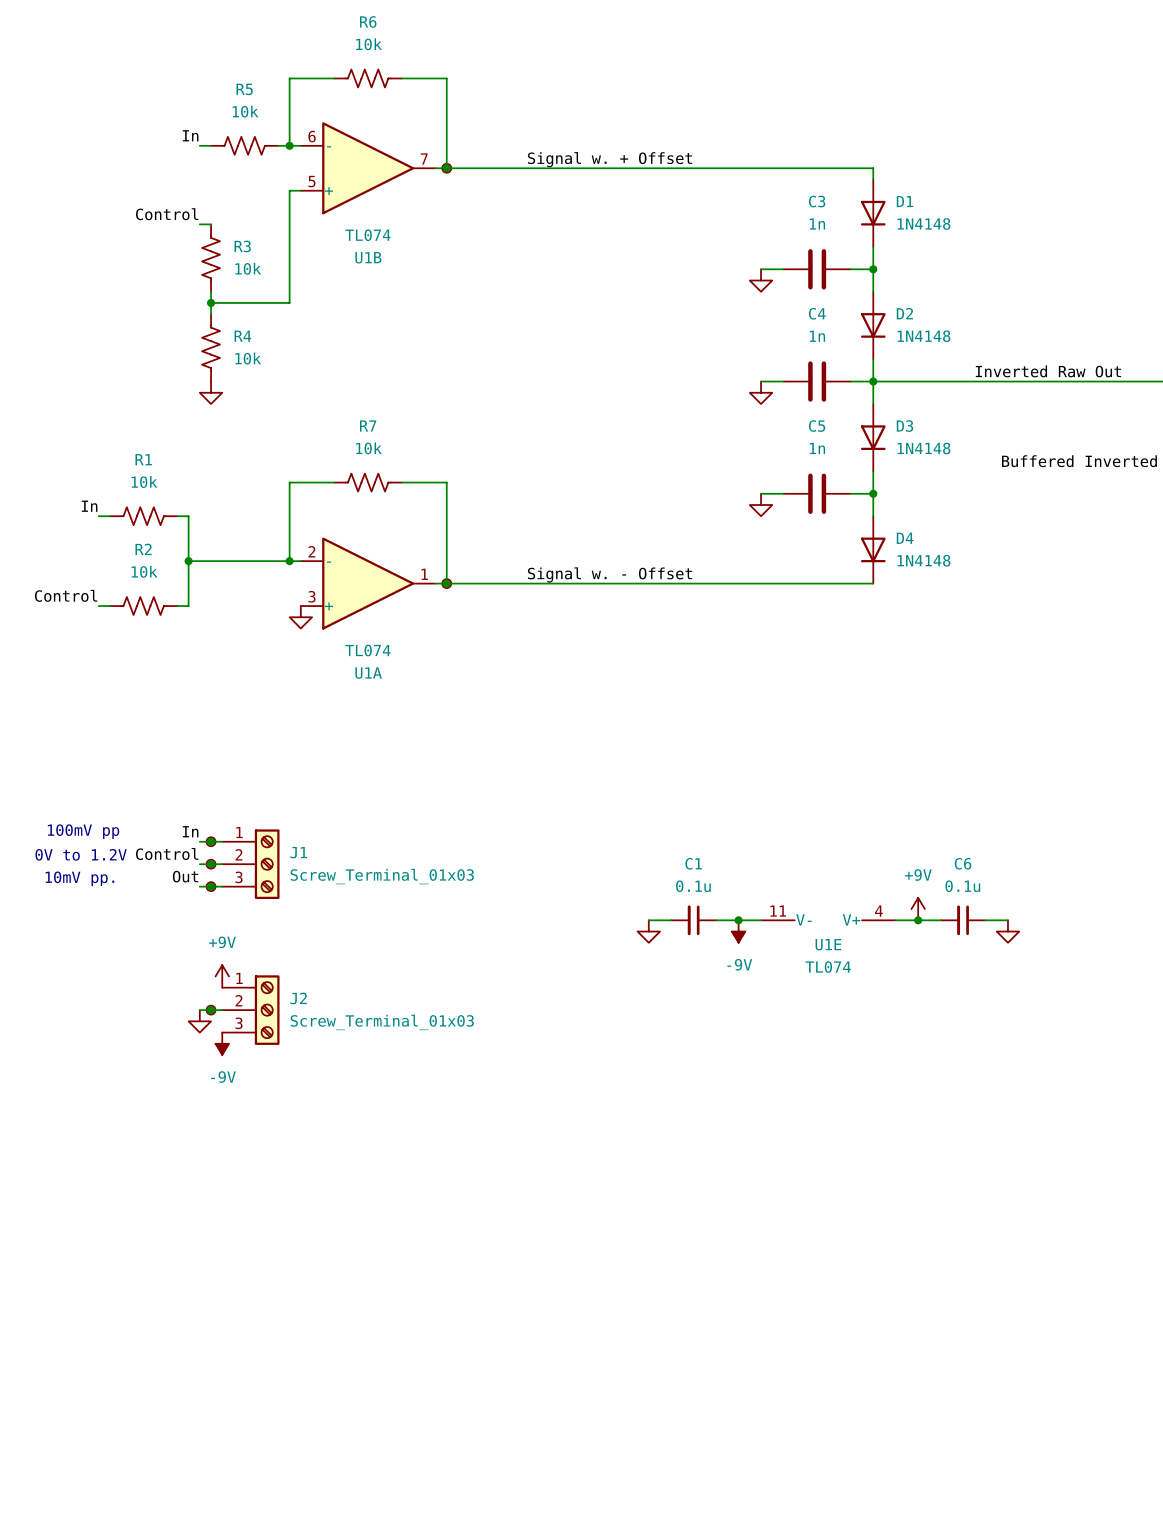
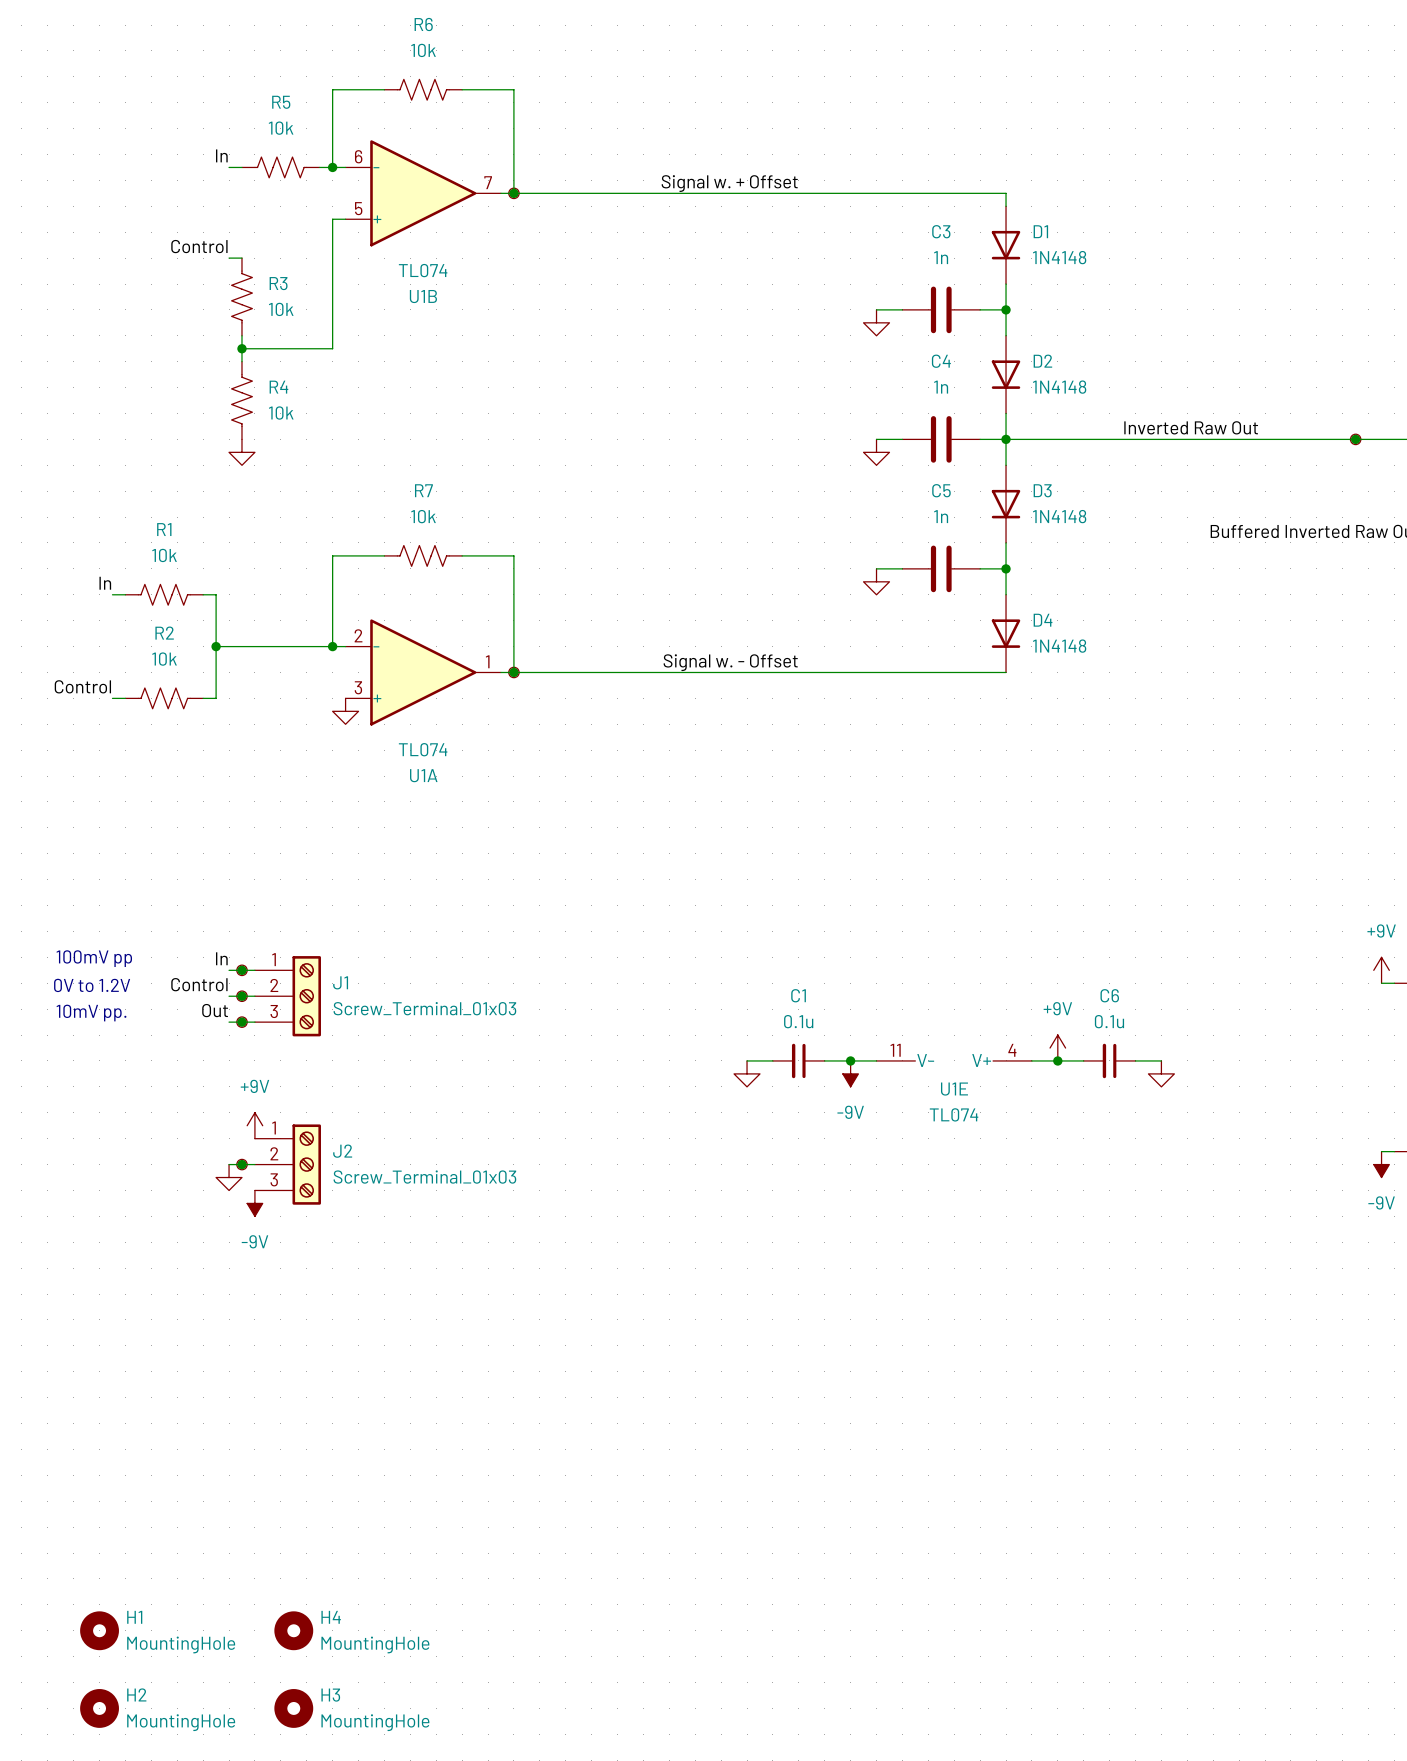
H1: none -> MountingHole (99, 1630)
H4: none -> MountingHole (293, 1630)
H2: none -> MountingHole (99, 1708)
H3: none -> MountingHole (293, 1708)

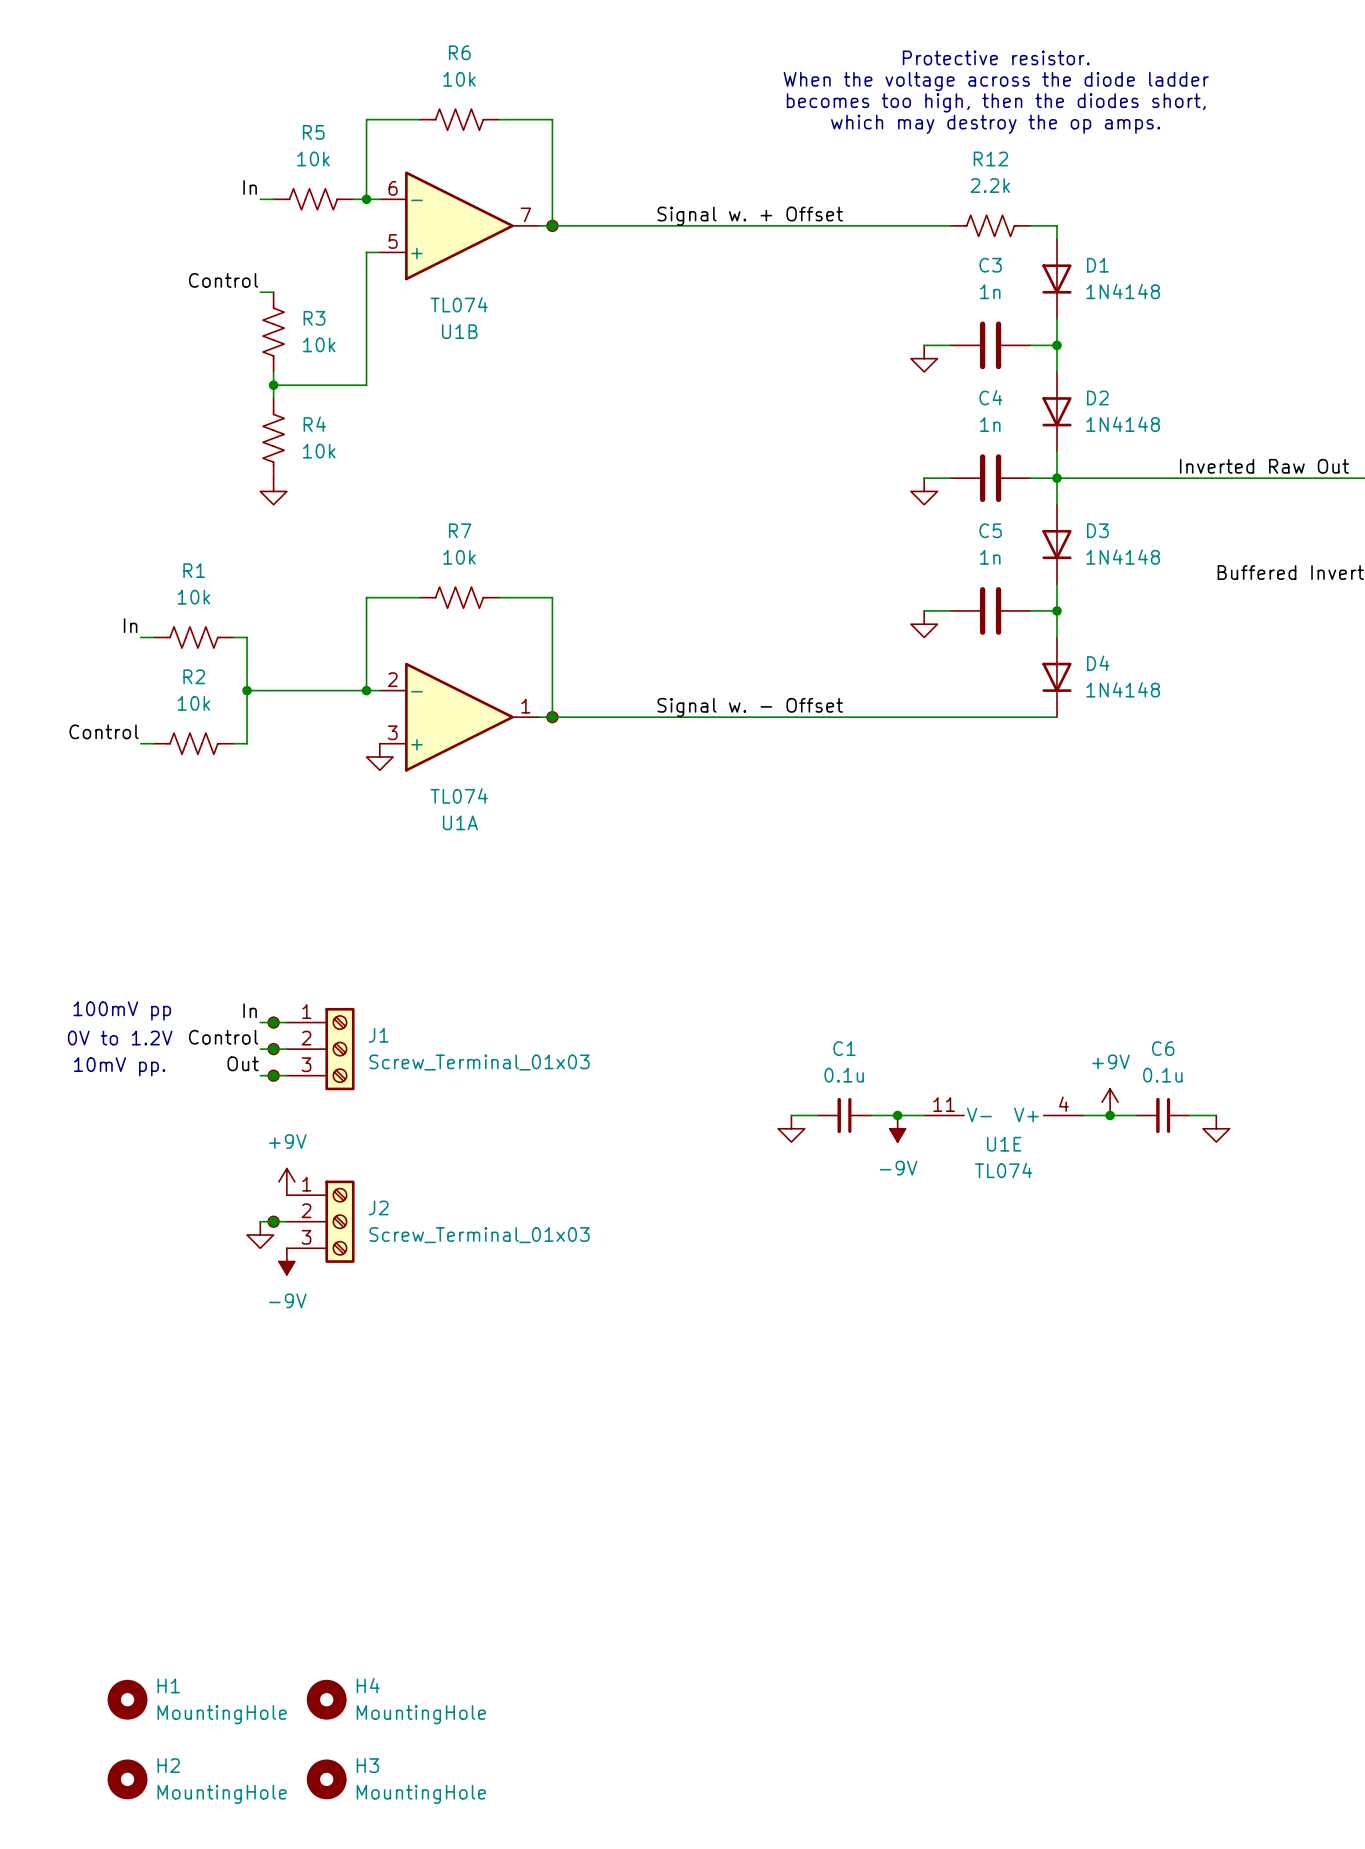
text: none -> Protective resistor. (996, 57)
text: none -> When the voltage across the diode ladder (996, 81)
text: none -> becomes too high, then the diodes short, (996, 102)
text: none -> which may destroy the op amps. (995, 124)
R12: none -> 2.2k (990, 225)

